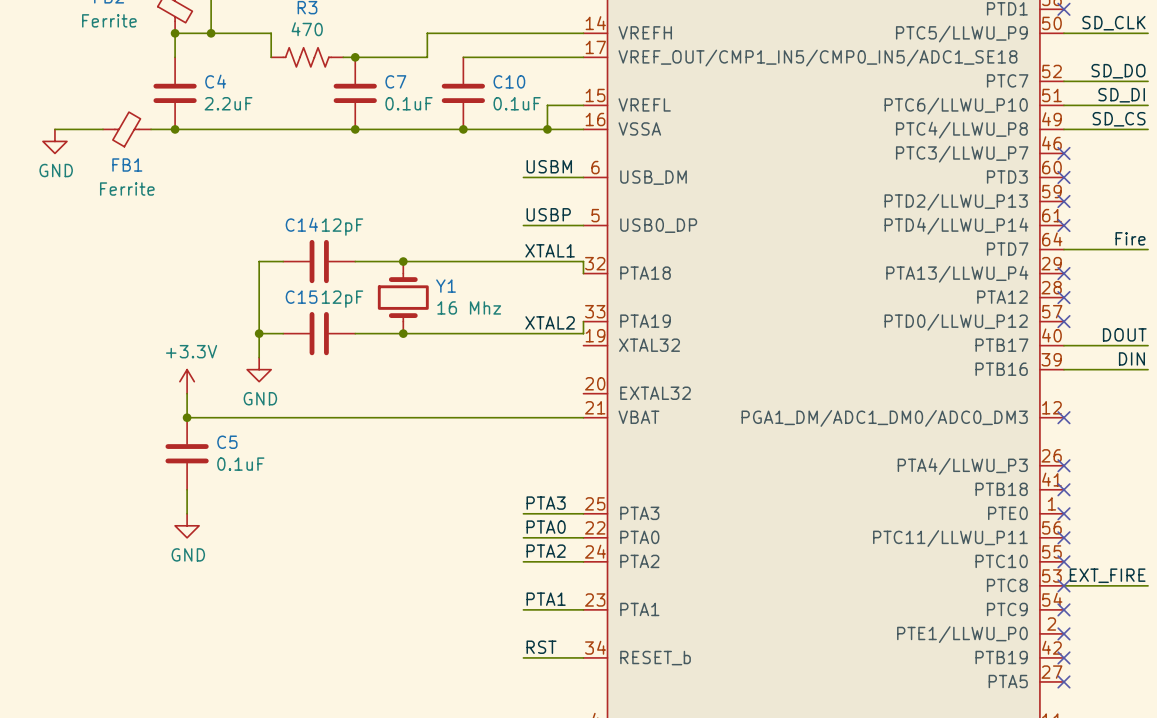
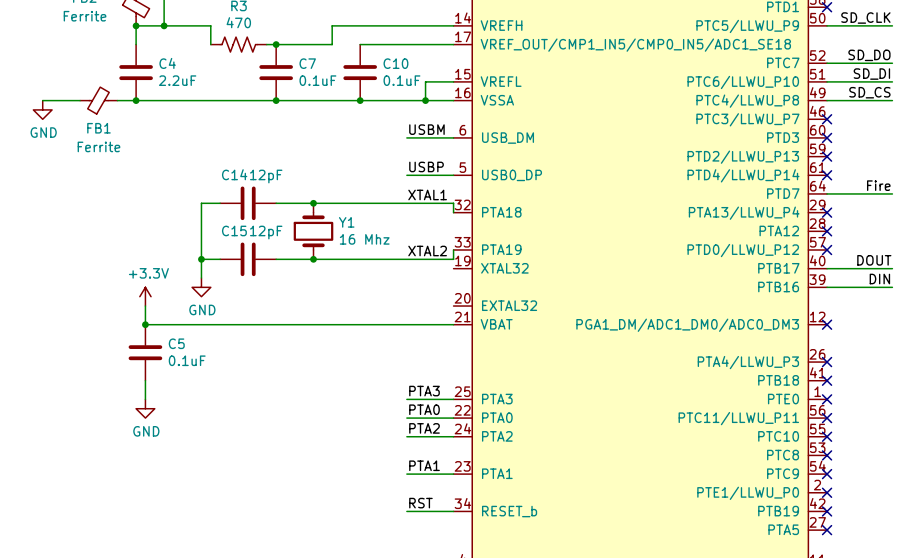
label: EXT_FIRE (1107, 575) -> none
wire: (1063, 585) (1148, 585) -> none

